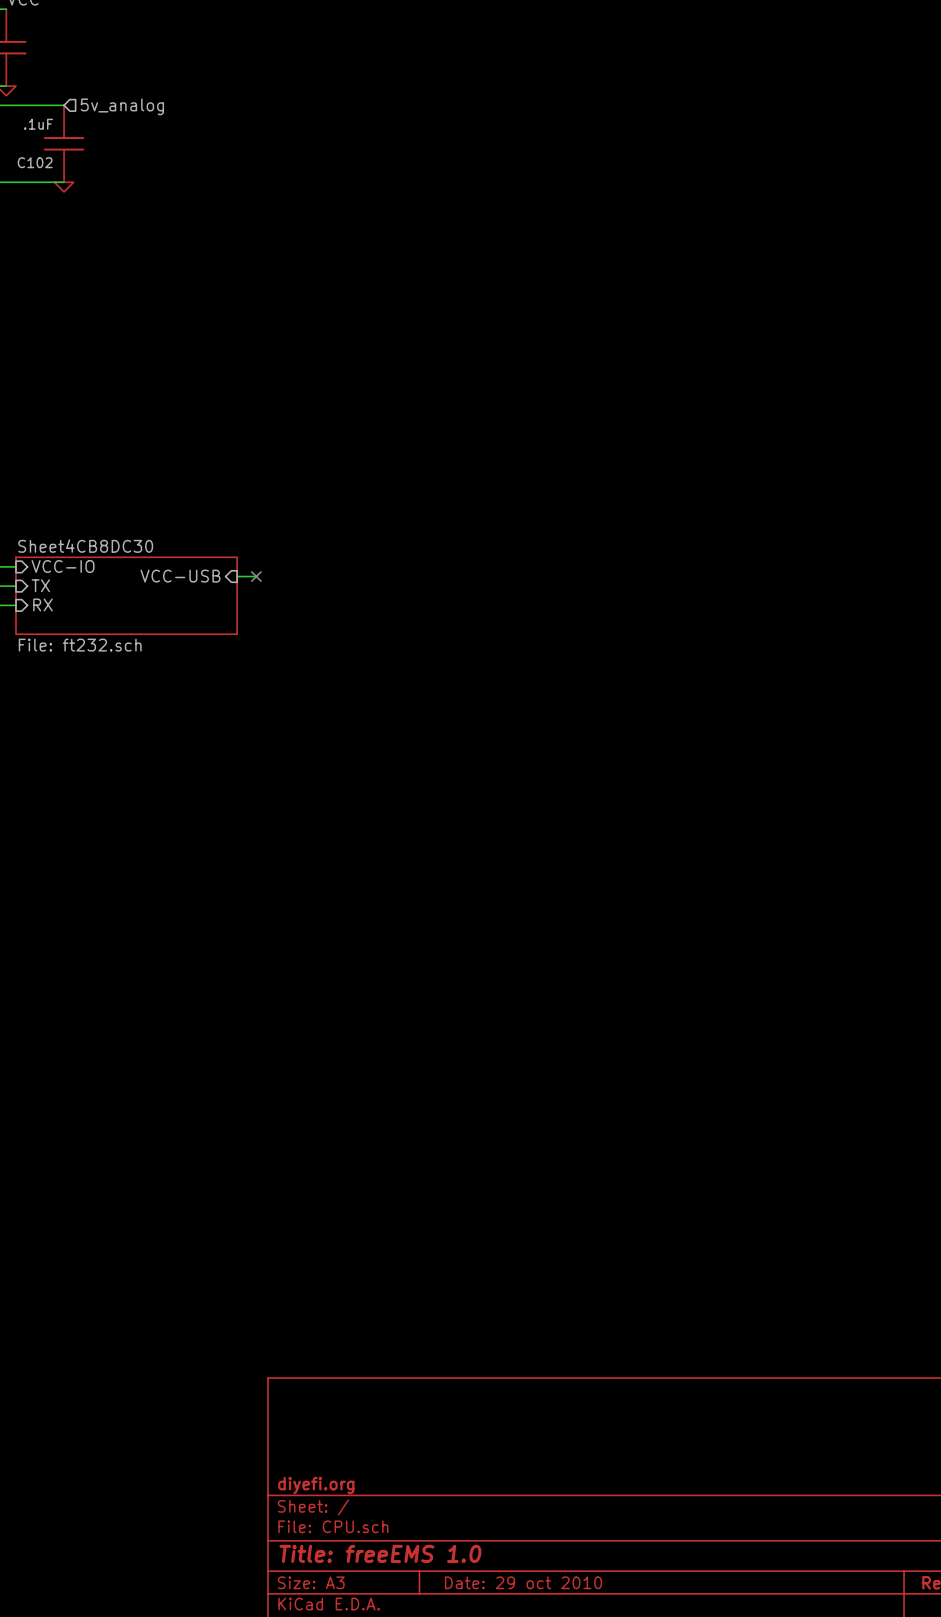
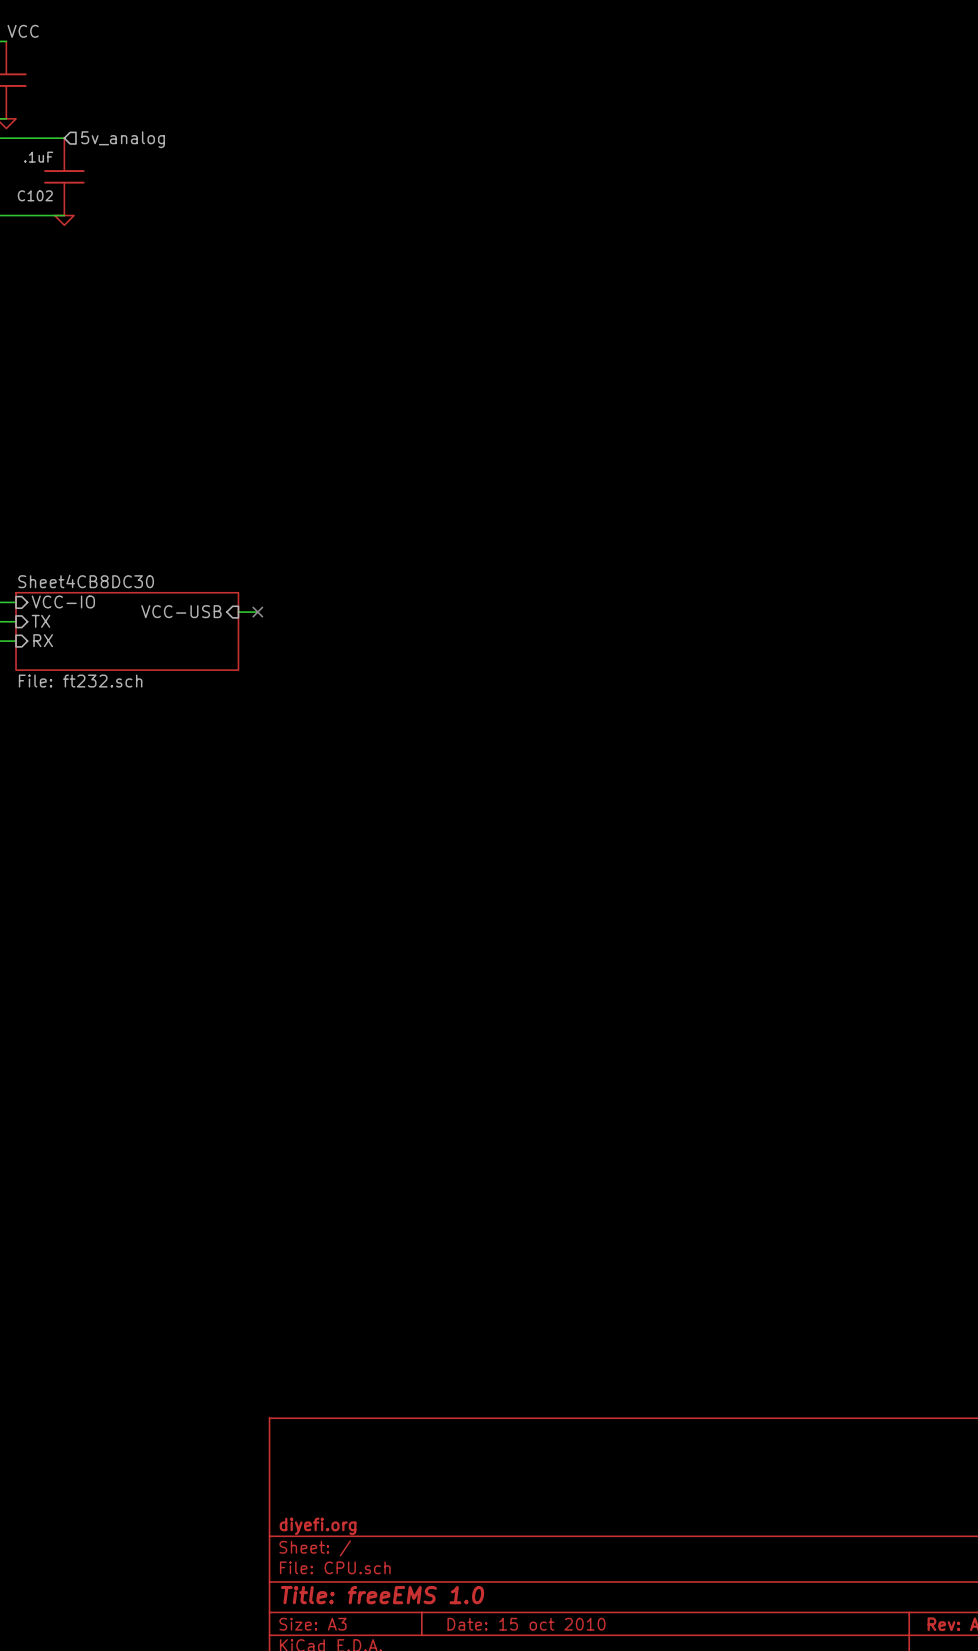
title block: Date: 29 oct 2010 (523, 1582) -> Date: 15 oct 2010 (526, 1624)

